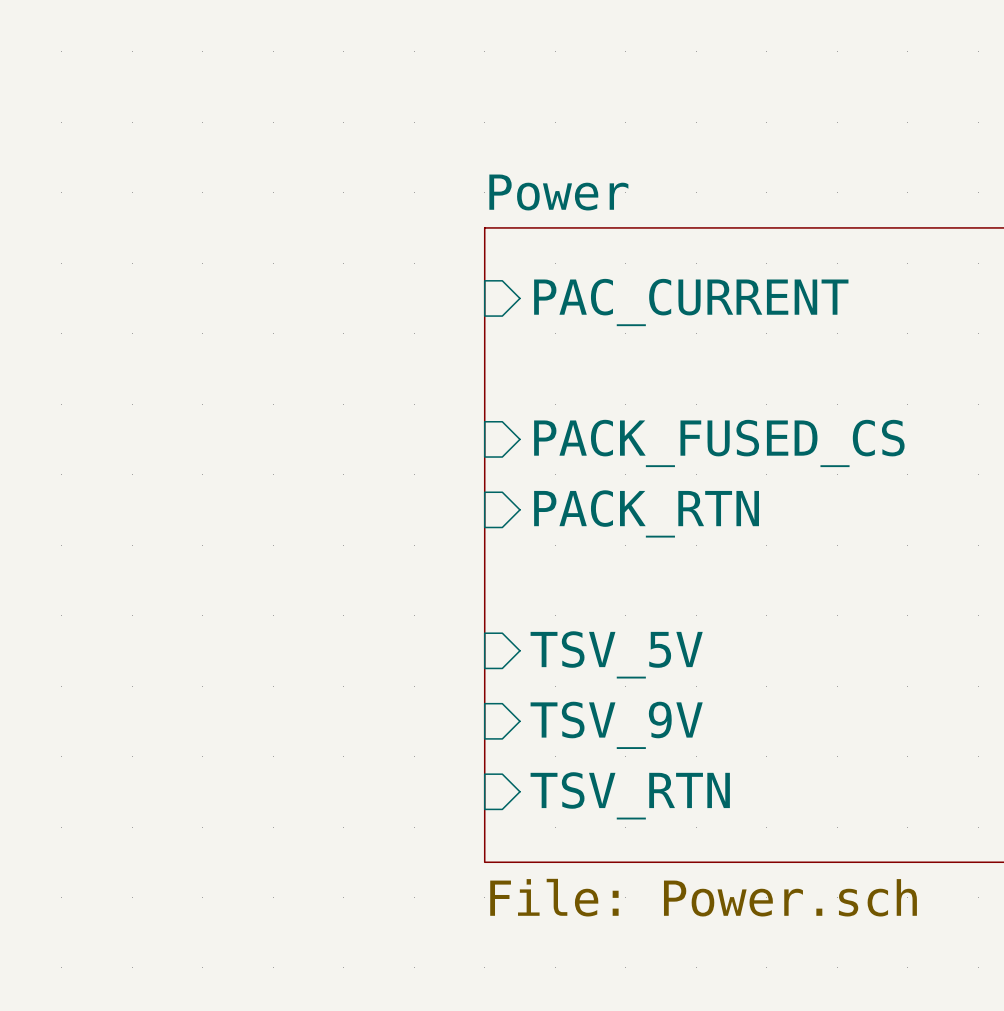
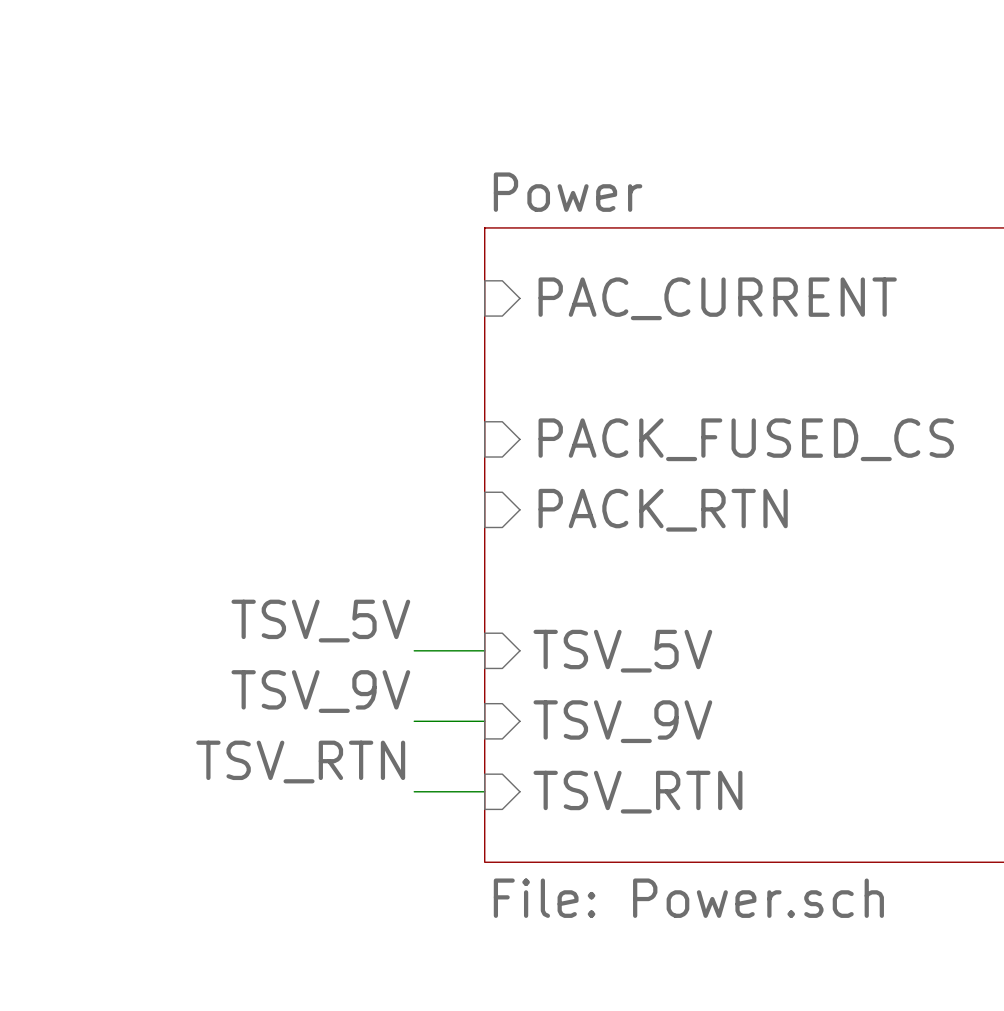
label: none -> TSV_5V (320, 621)
wire: none -> (414, 650) (484, 650)
label: none -> TSV_9V (320, 691)
wire: none -> (414, 721) (484, 721)
label: none -> TSV_RTN (300, 762)
wire: none -> (414, 791) (484, 791)

